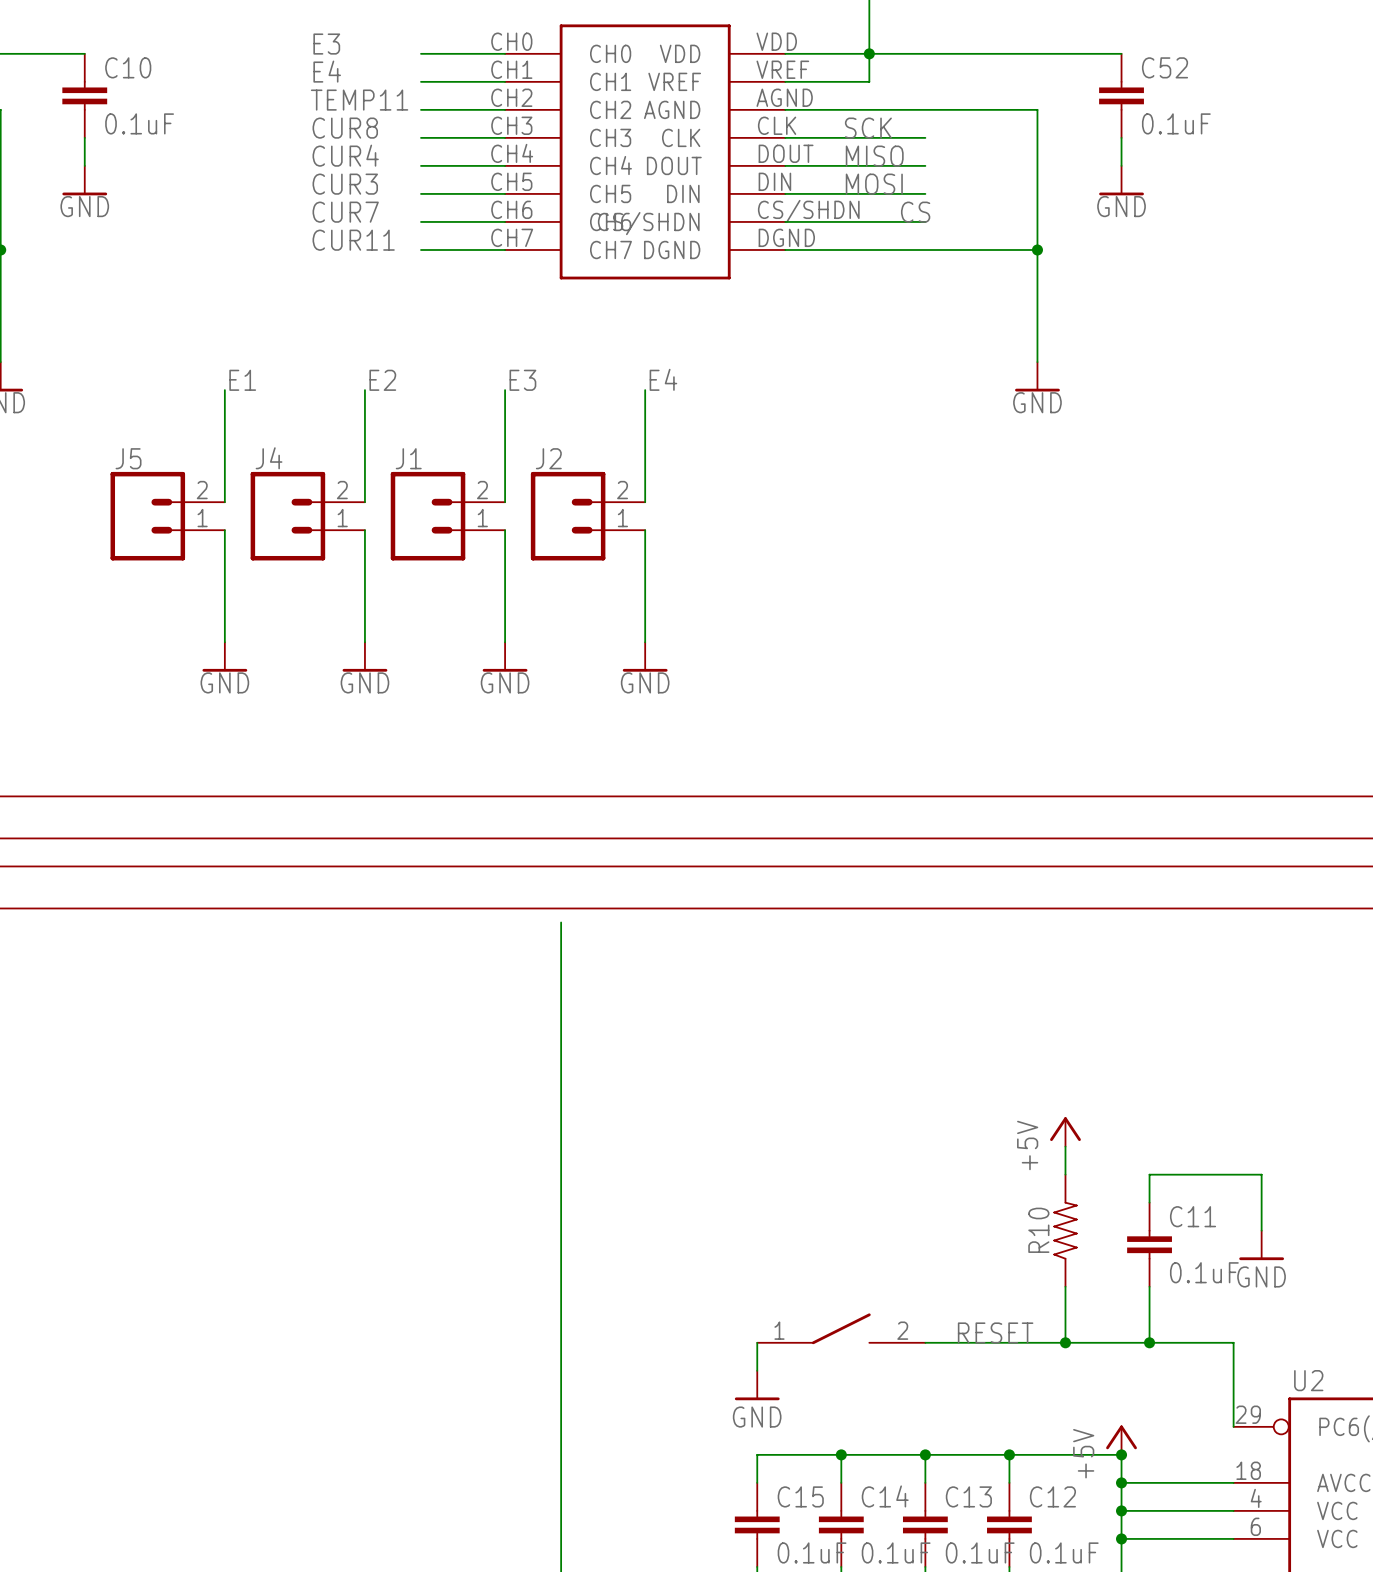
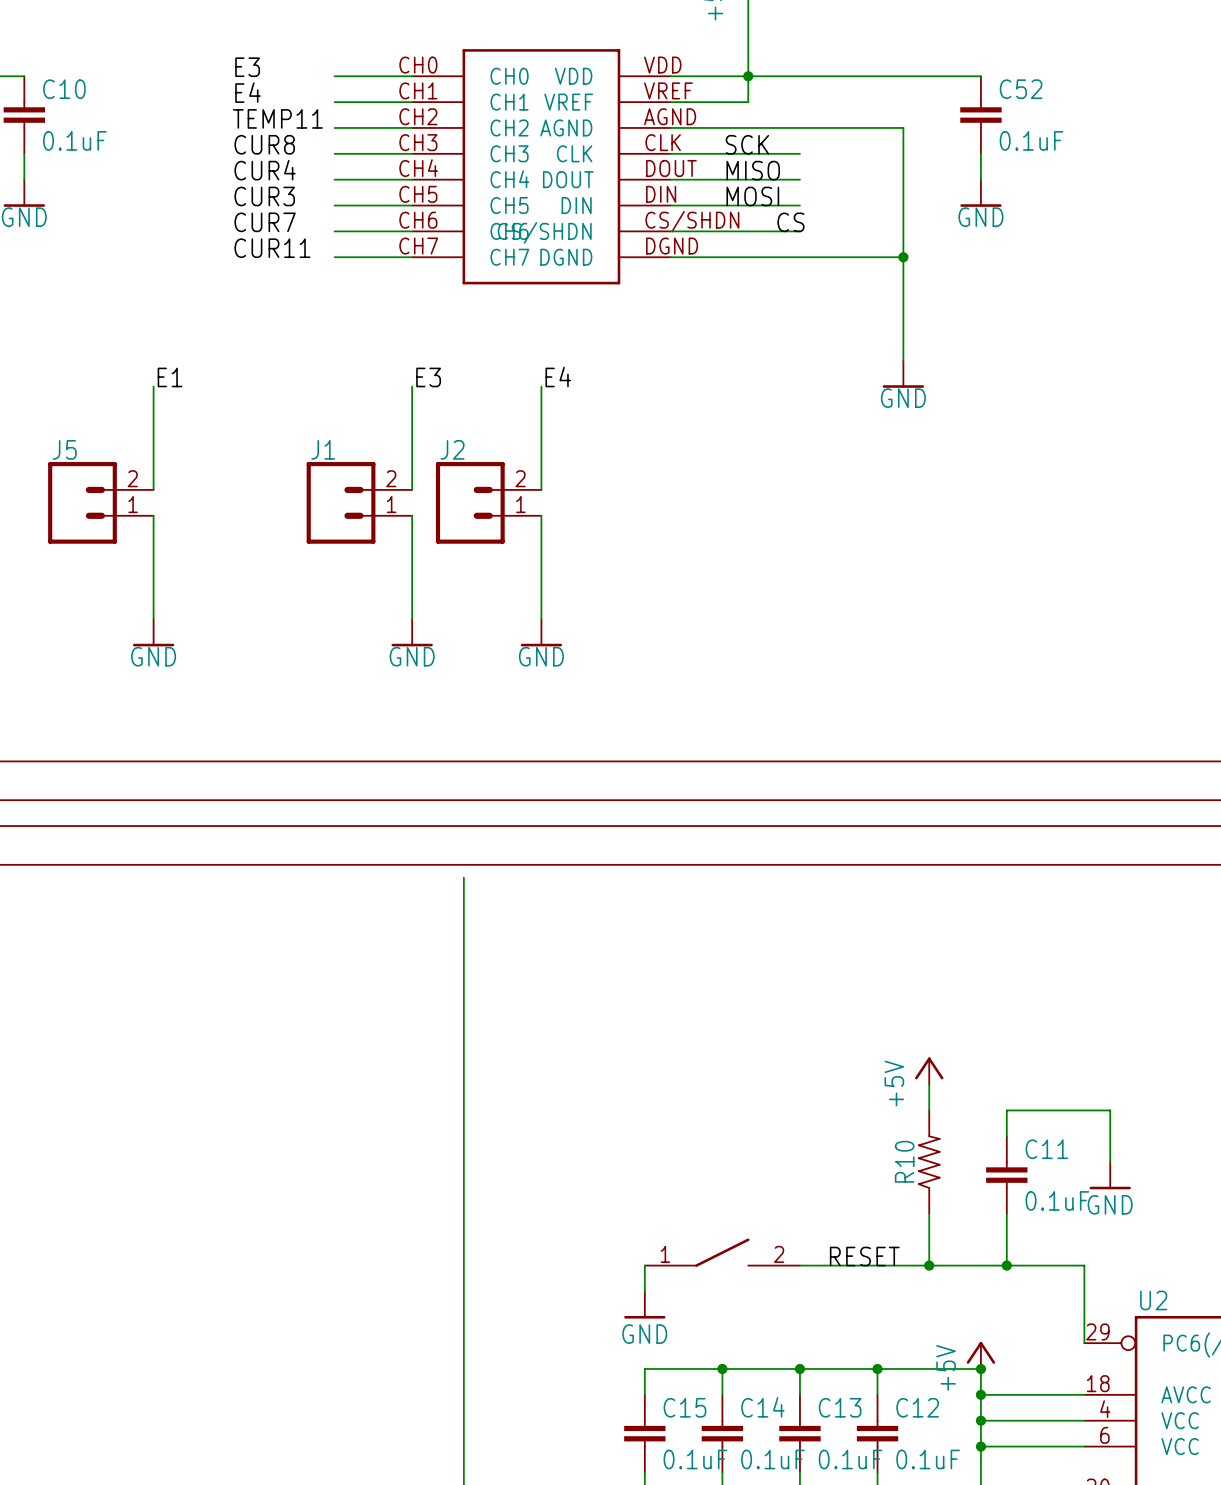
label: E2 (382, 380) -> none
wire: (364, 390) (364, 502) -> none
J4: (307, 516) -> none
wire: (364, 530) (364, 642) -> none
power symbol: GND (364, 656) -> none

